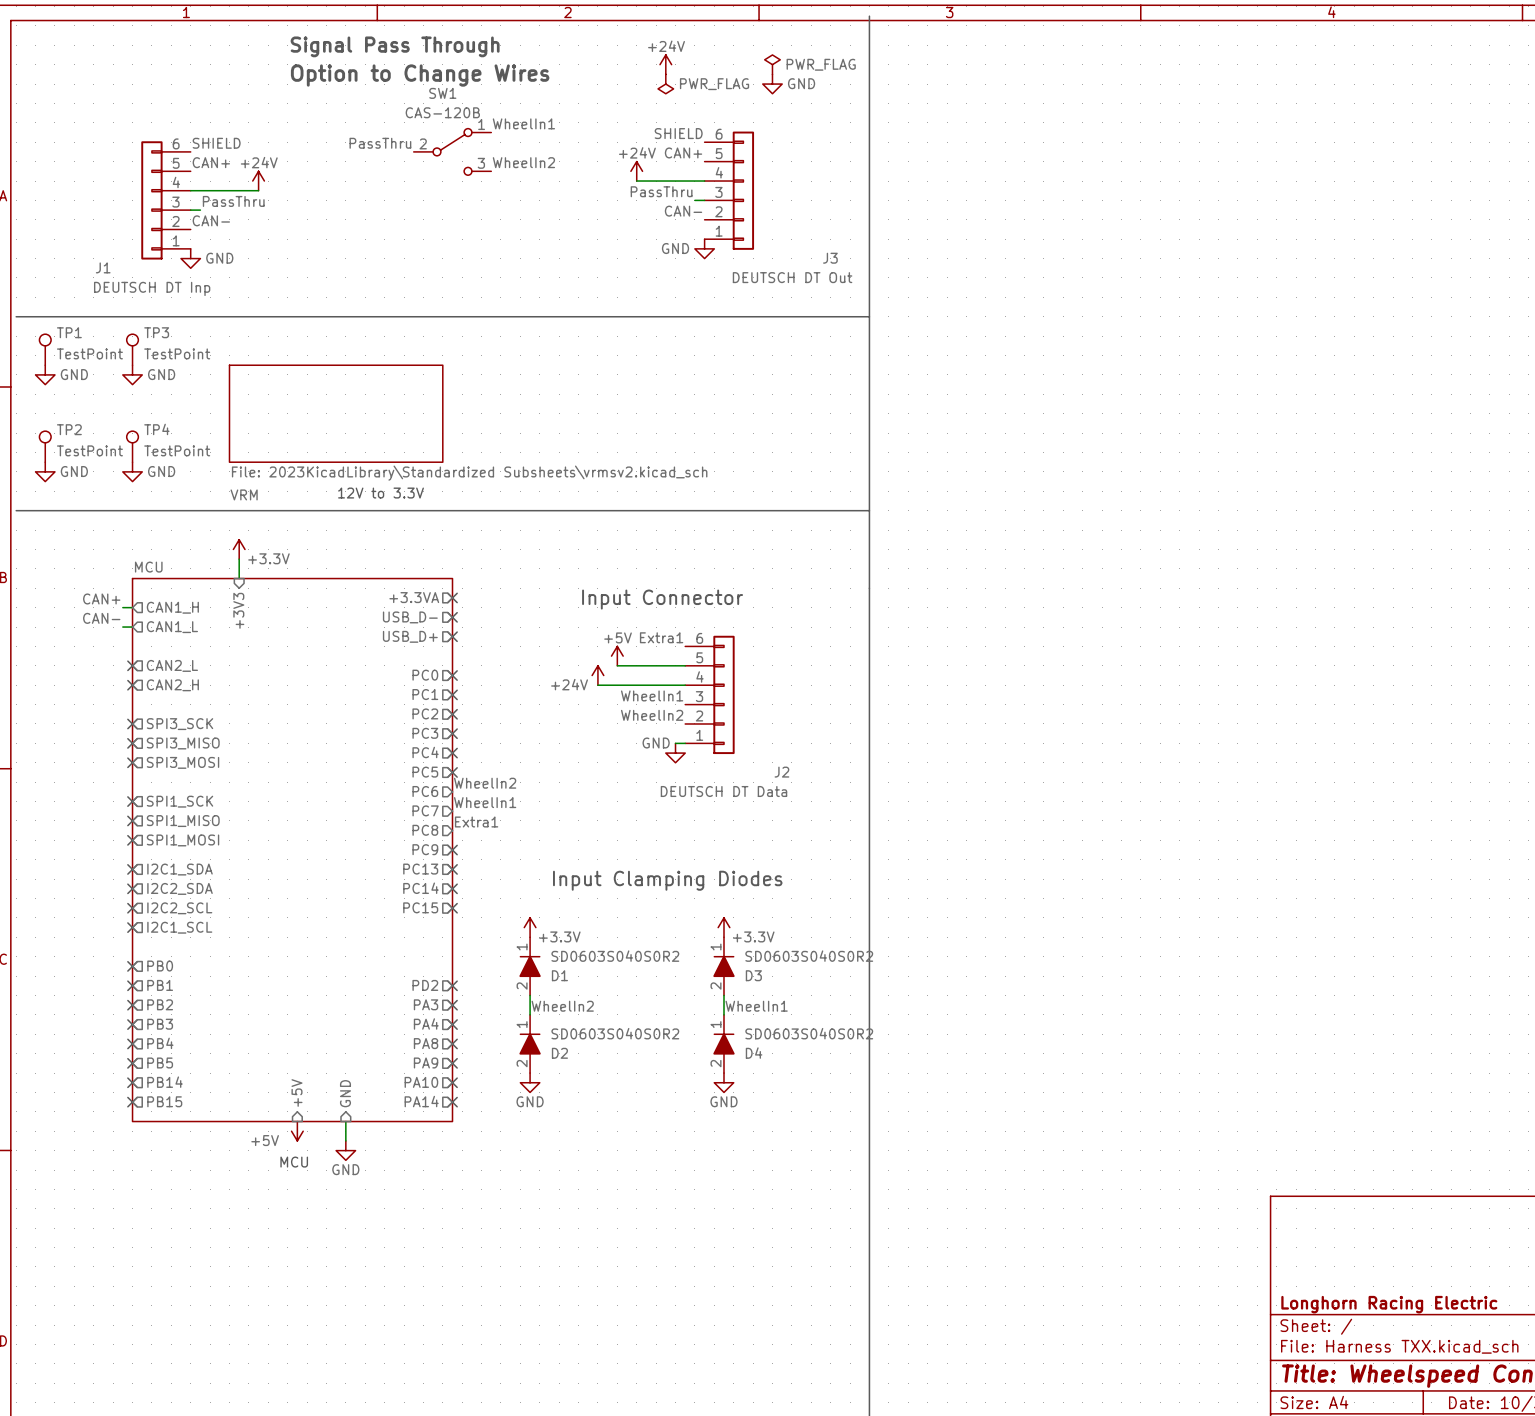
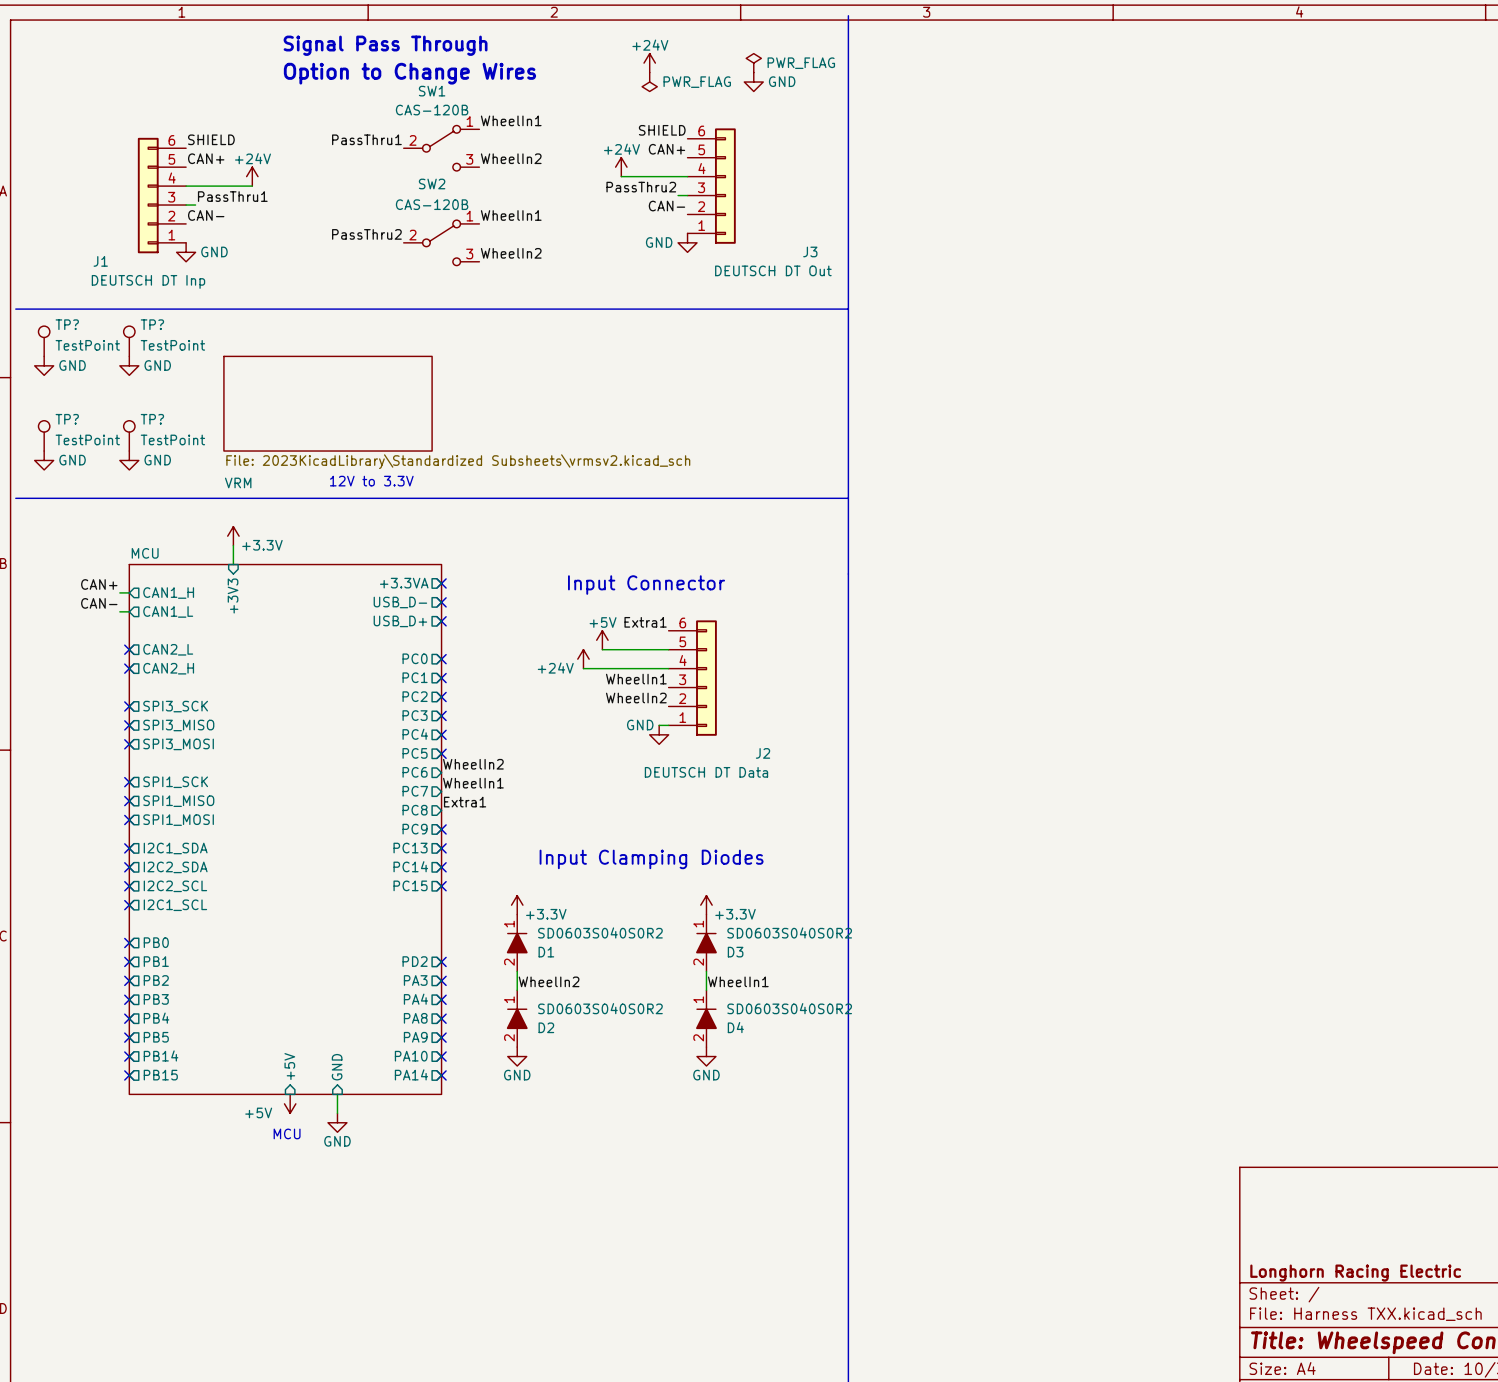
label: PassThru (380, 143) -> PassThru1 (366, 139)
label: PassThru (661, 191) -> PassThru2 (641, 187)
label: PassThru (233, 201) -> PassThru1 (232, 196)
label: none -> WheelIn1 (511, 215)
label: none -> PassThru2 (366, 234)
SW2: none -> CAS-120B (441, 242)
label: none -> WheelIn2 (511, 253)
TP1 name: TP1 (69, 332) -> TP? (67, 324)
TP3 name: TP3 (156, 332) -> TP? (152, 324)
TP2 name: TP2 (69, 429) -> TP? (67, 419)
TP4 name: TP4 (156, 429) -> TP? (152, 419)

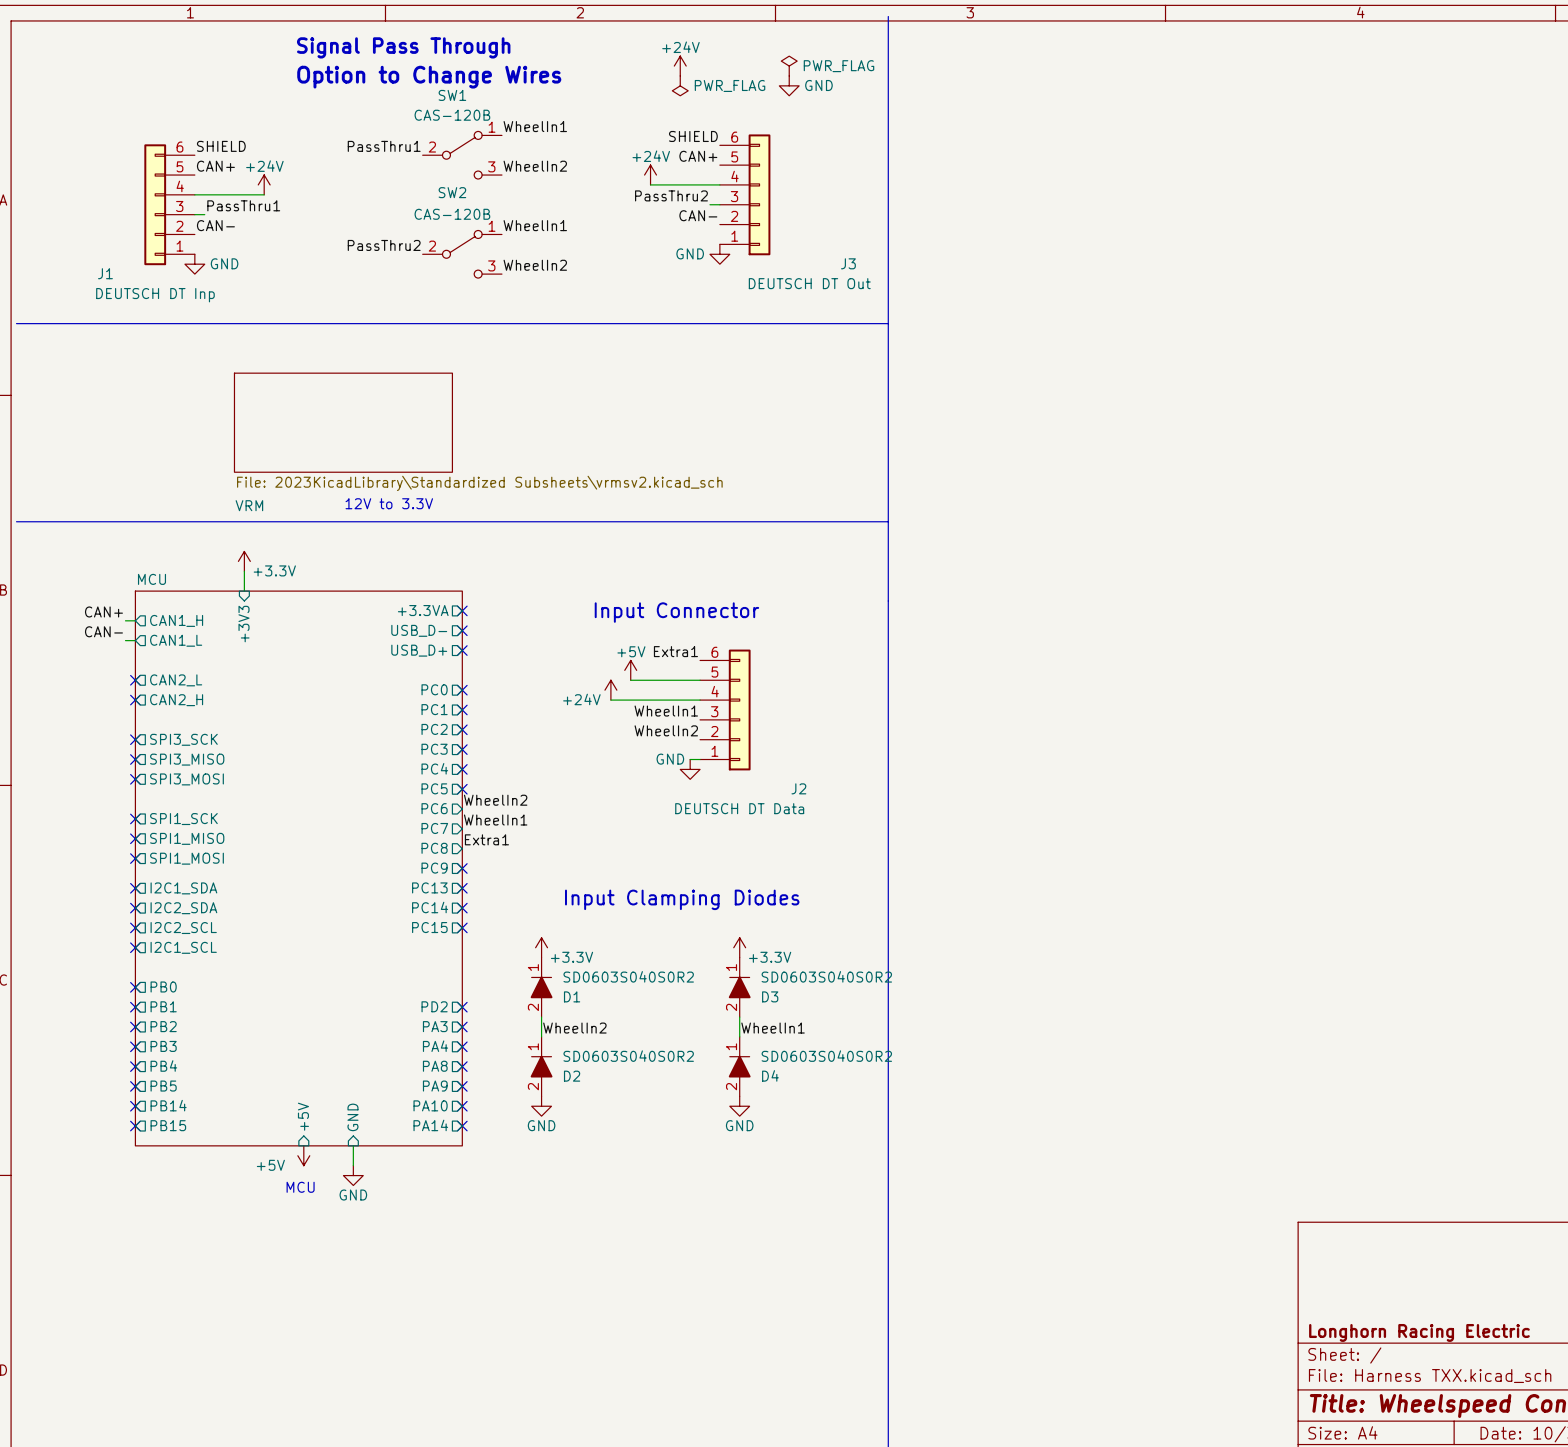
TP?: TestPoint (44, 341) -> none
TP?: TestPoint (129, 341) -> none
power symbol: GND (44, 365) -> none
power symbol: GND (129, 365) -> none
TP?: TestPoint (44, 435) -> none
TP?: TestPoint (129, 435) -> none
power symbol: GND (44, 460) -> none
power symbol: GND (129, 460) -> none

